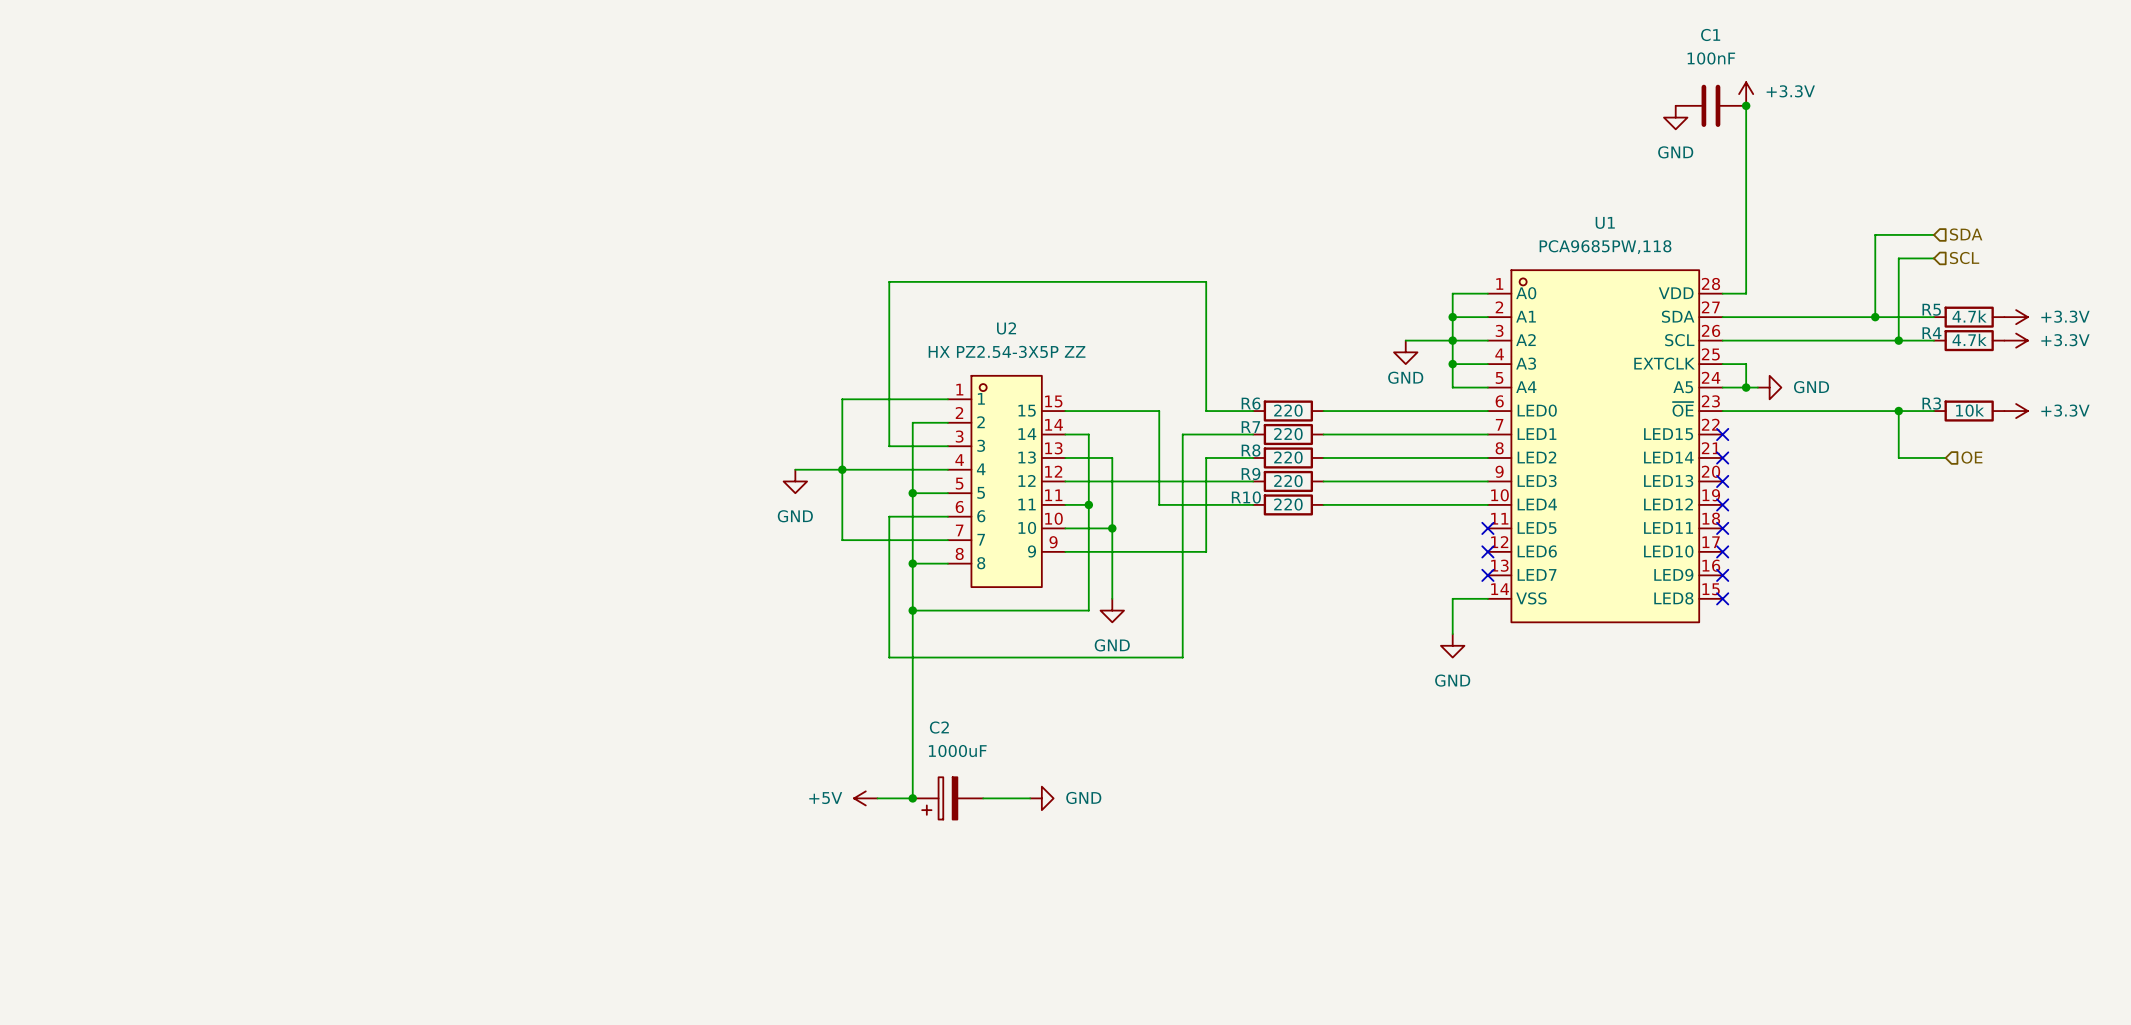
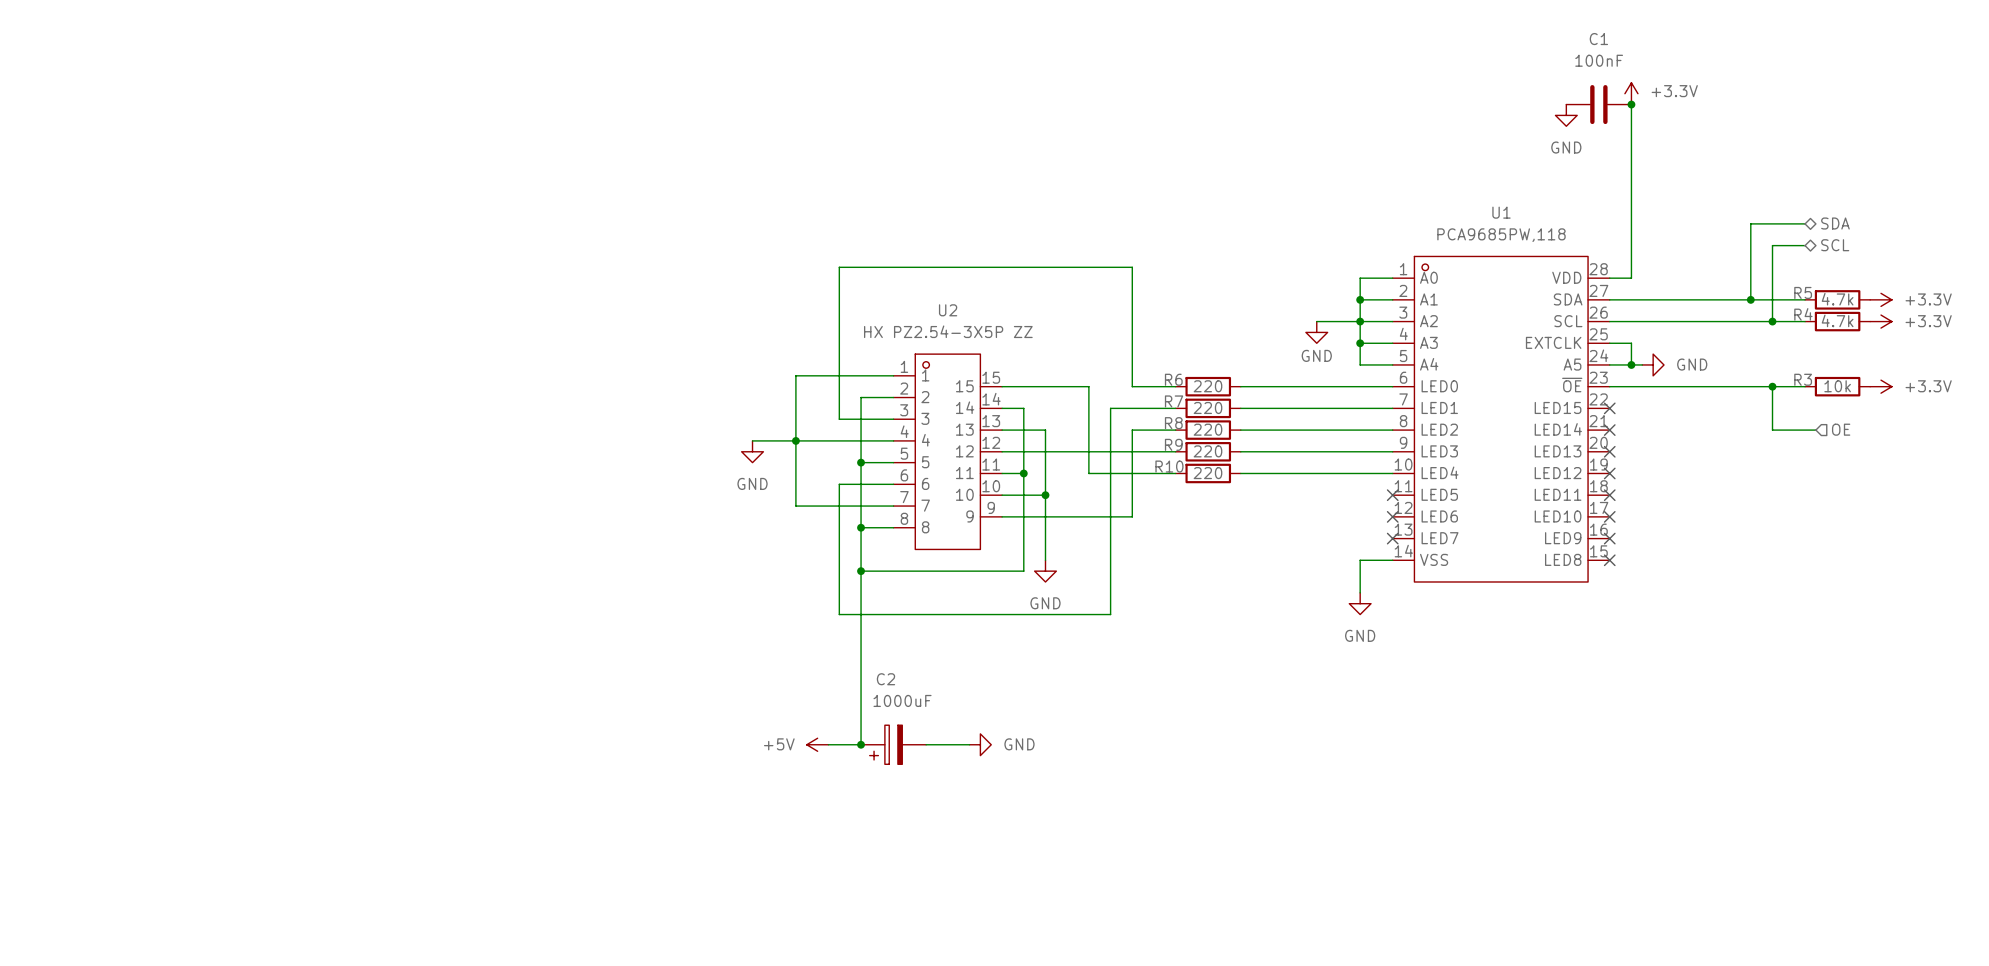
hierarchical label shape: input (1966, 234) -> bidirectional (1835, 223)
hierarchical label shape: input (1964, 258) -> bidirectional (1835, 245)

